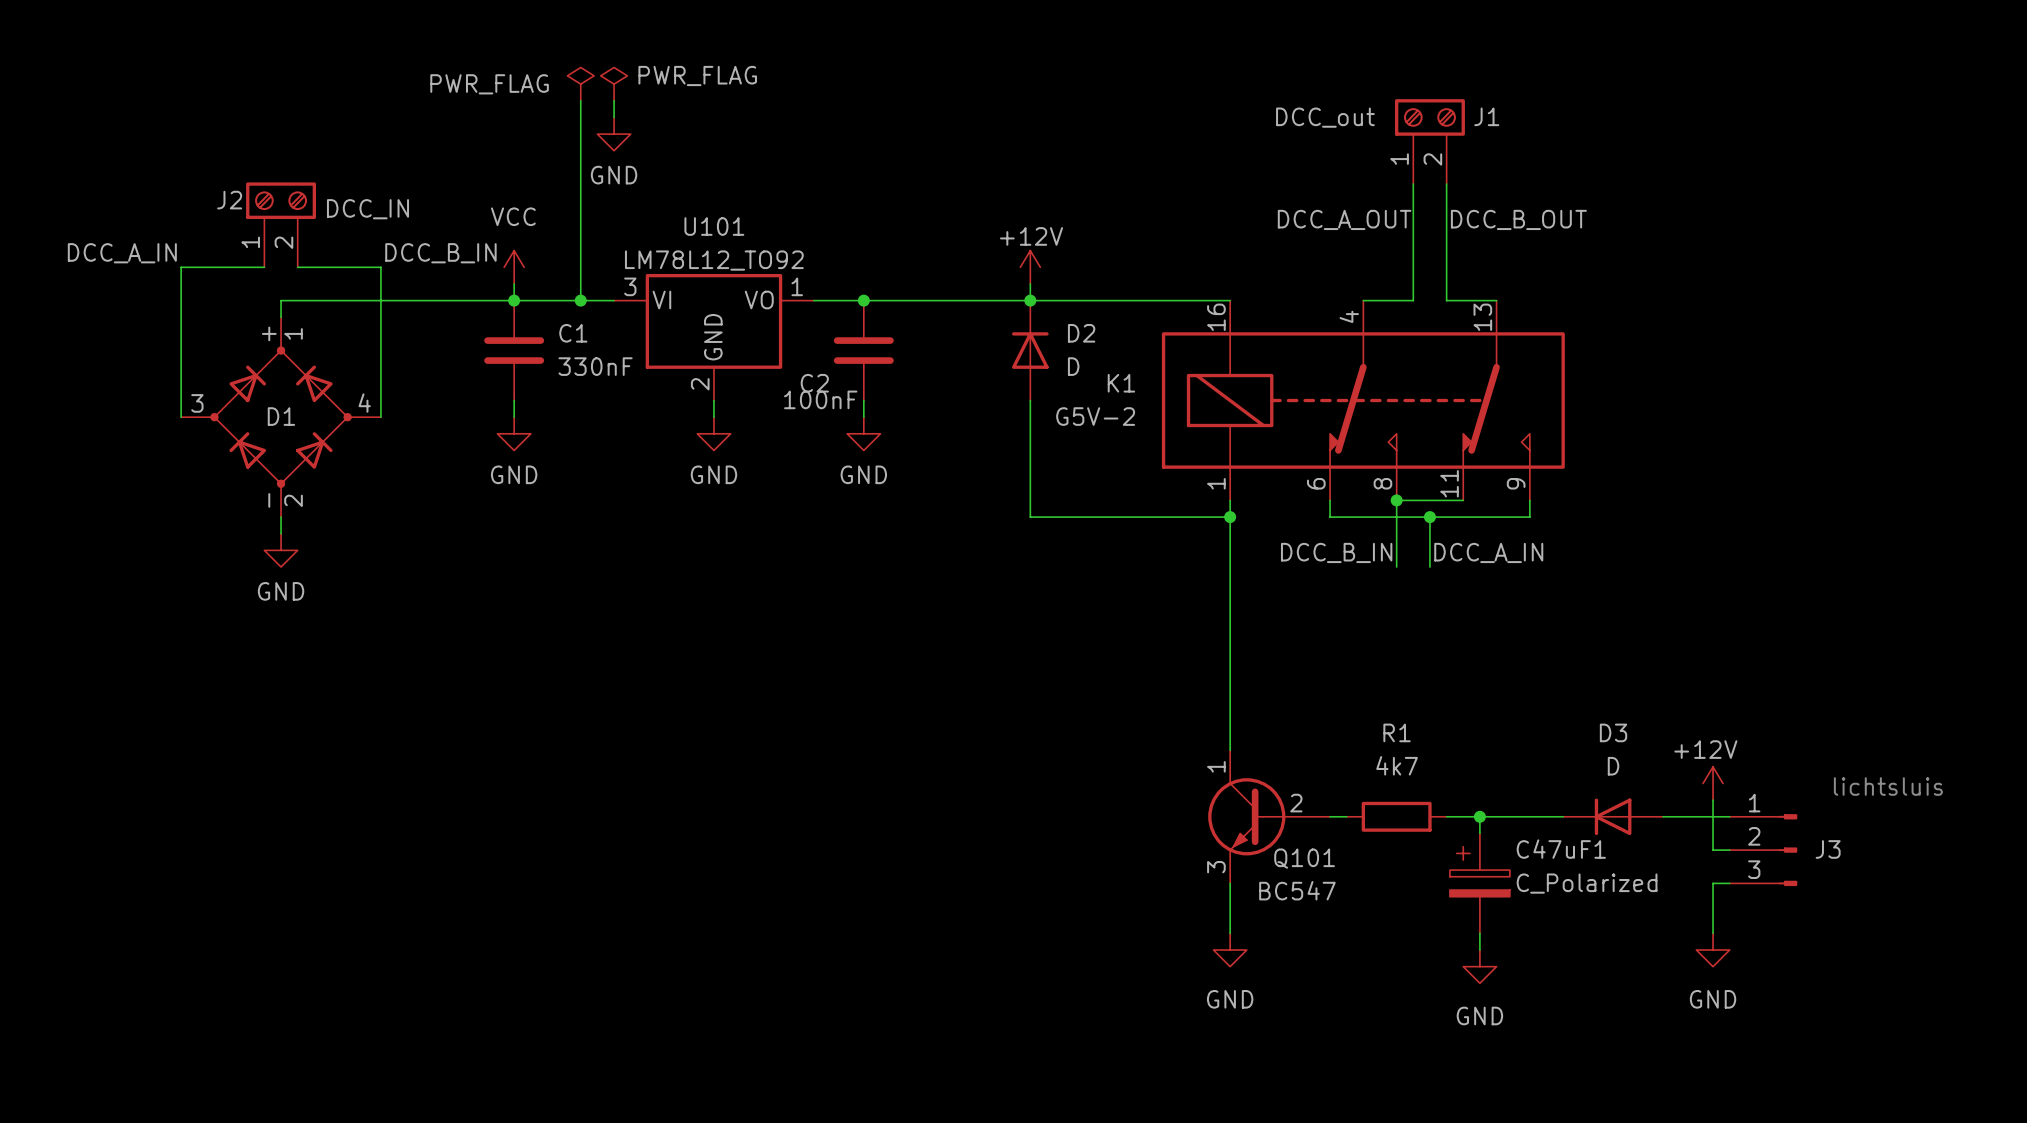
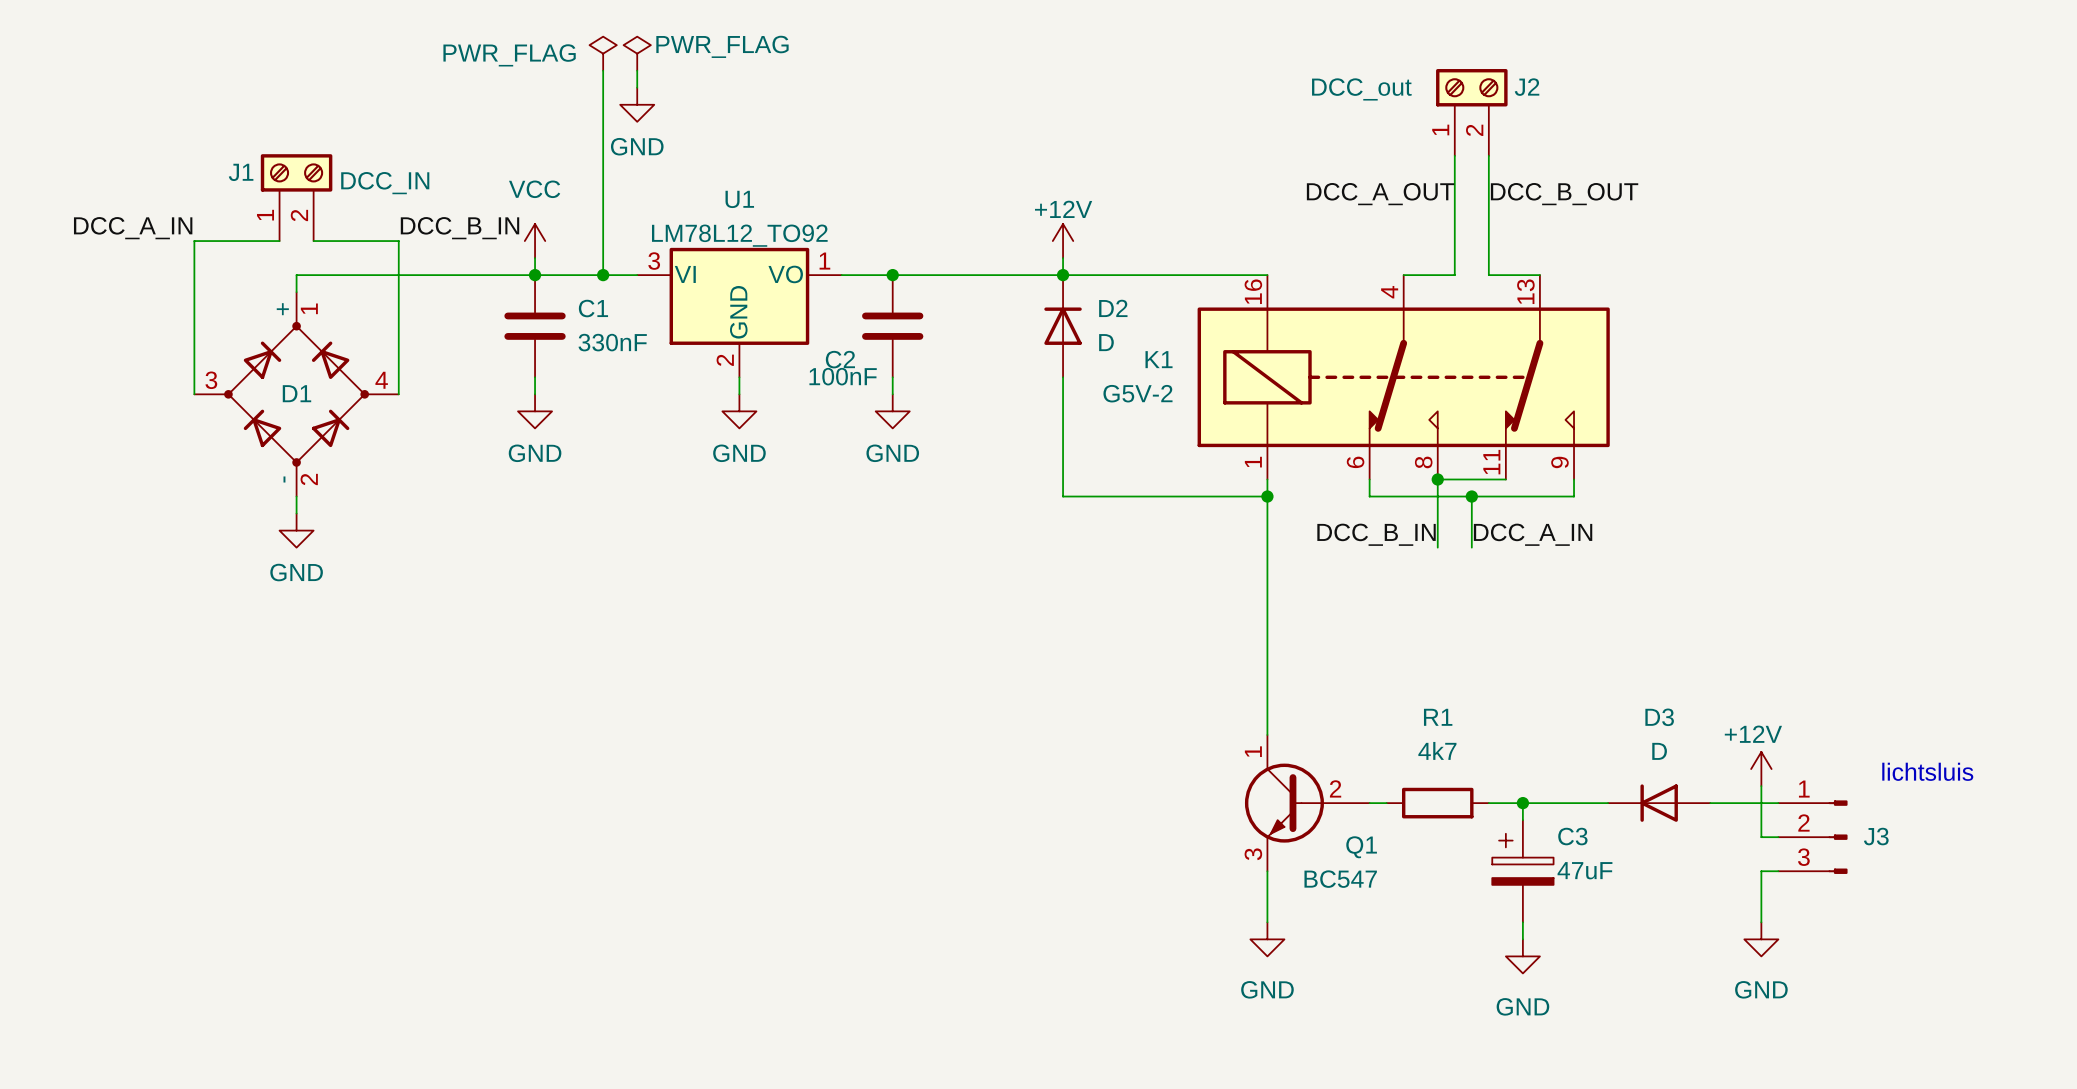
J1 name: J1 (1486, 116) -> J2 (1527, 87)
J2 name: J2 (229, 200) -> J1 (241, 172)
U101 name: U101 (714, 226) -> U1 (739, 199)
C47uF1 name: C47uF1 (1561, 849) -> C3 (1572, 836)
Q101 name: Q101 (1304, 858) -> Q1 (1361, 847)
C47uF1 value: C_Polarized (1587, 883) -> 47uF (1584, 870)

